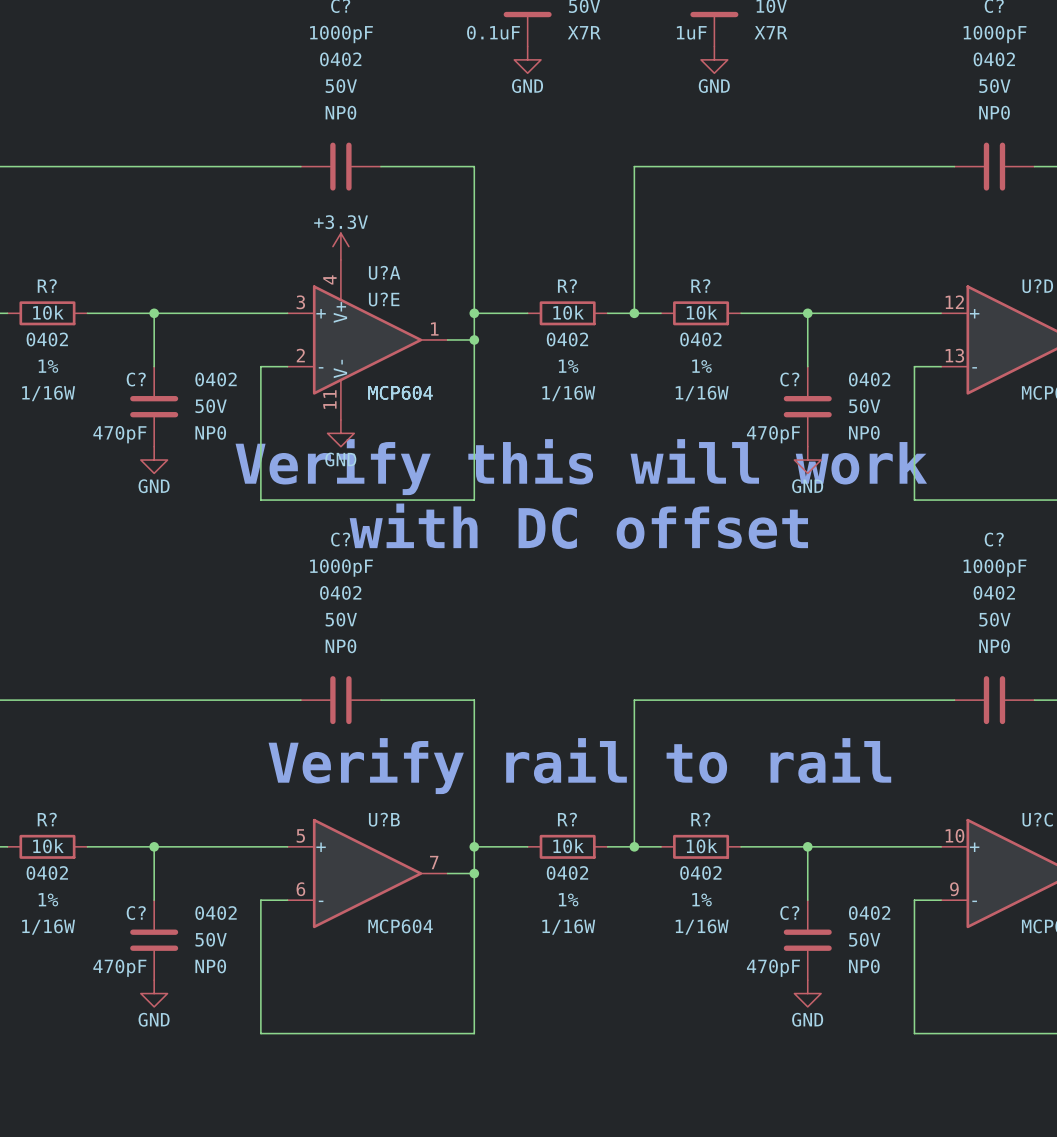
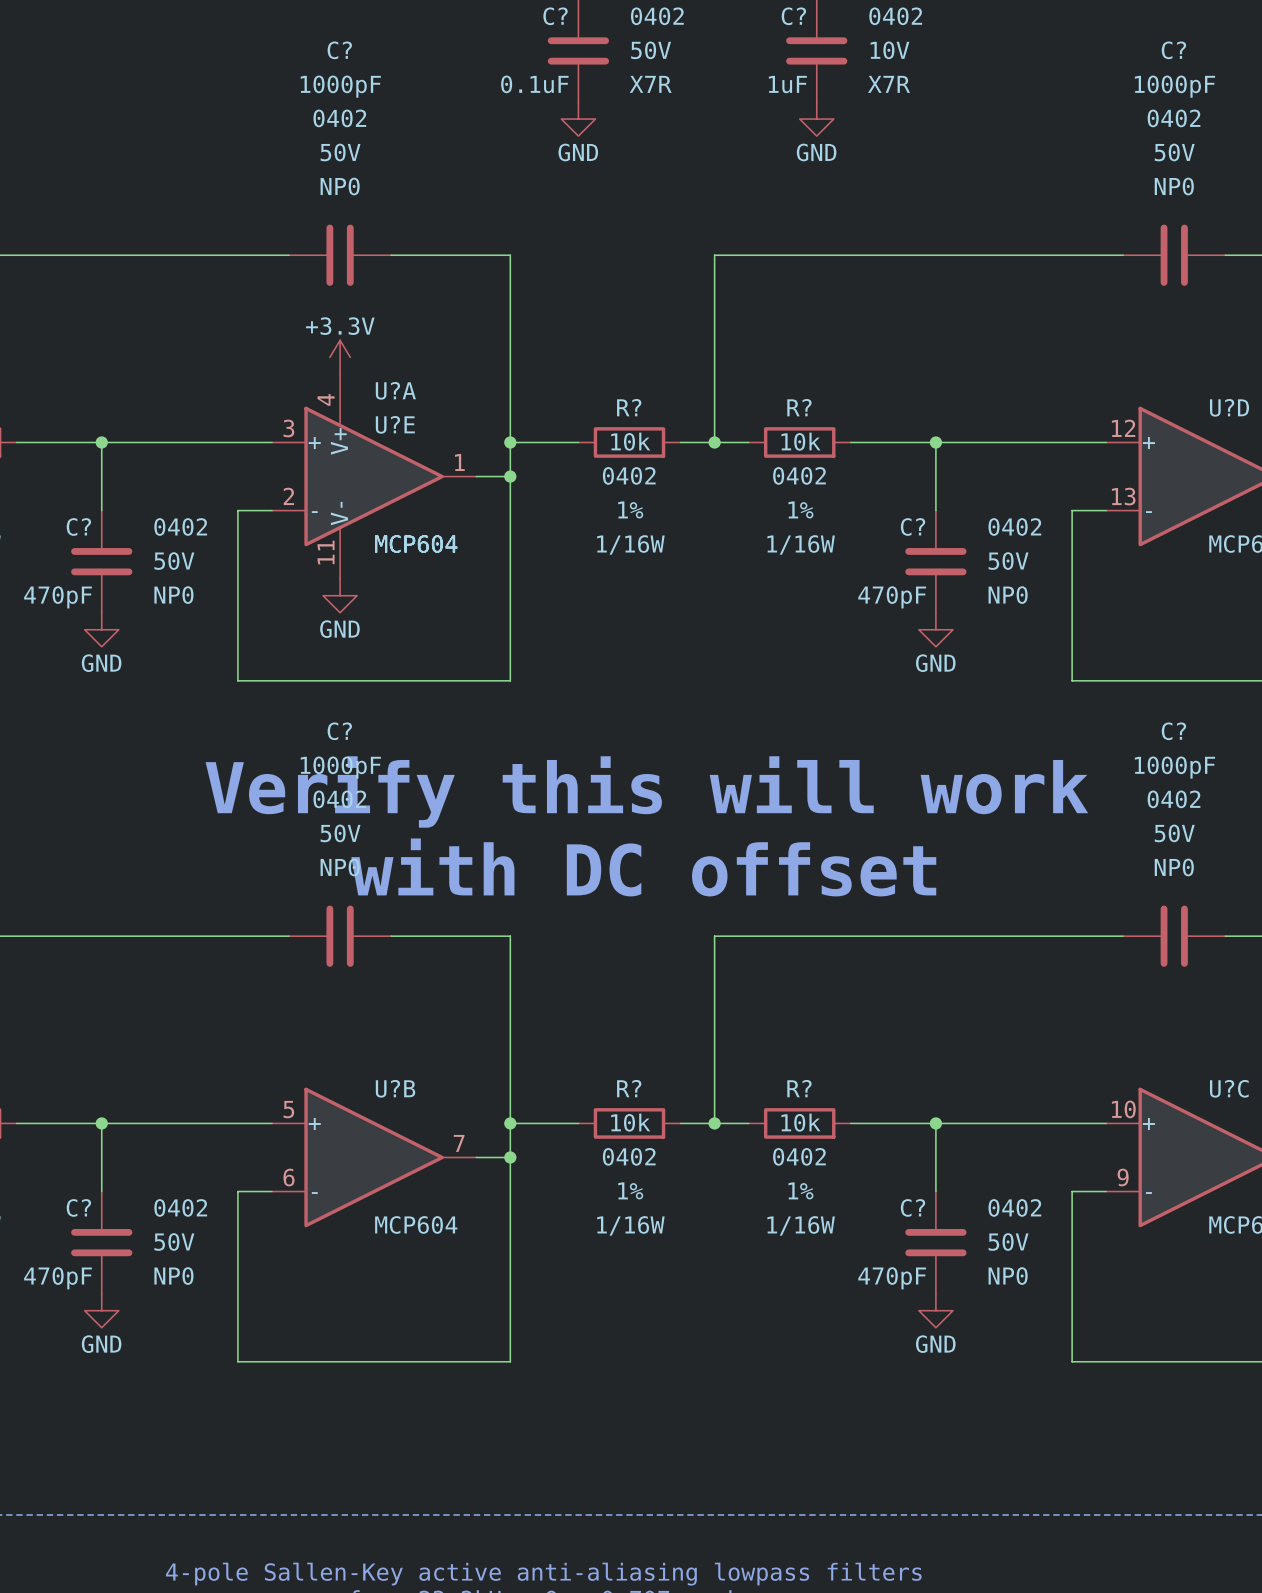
text position: Verify this will work (581, 467) -> Verify this will work (646, 791)
text position: with DC offset (578, 526) -> with DC offset (643, 867)
text: Verify rail to rail (579, 766) -> none

